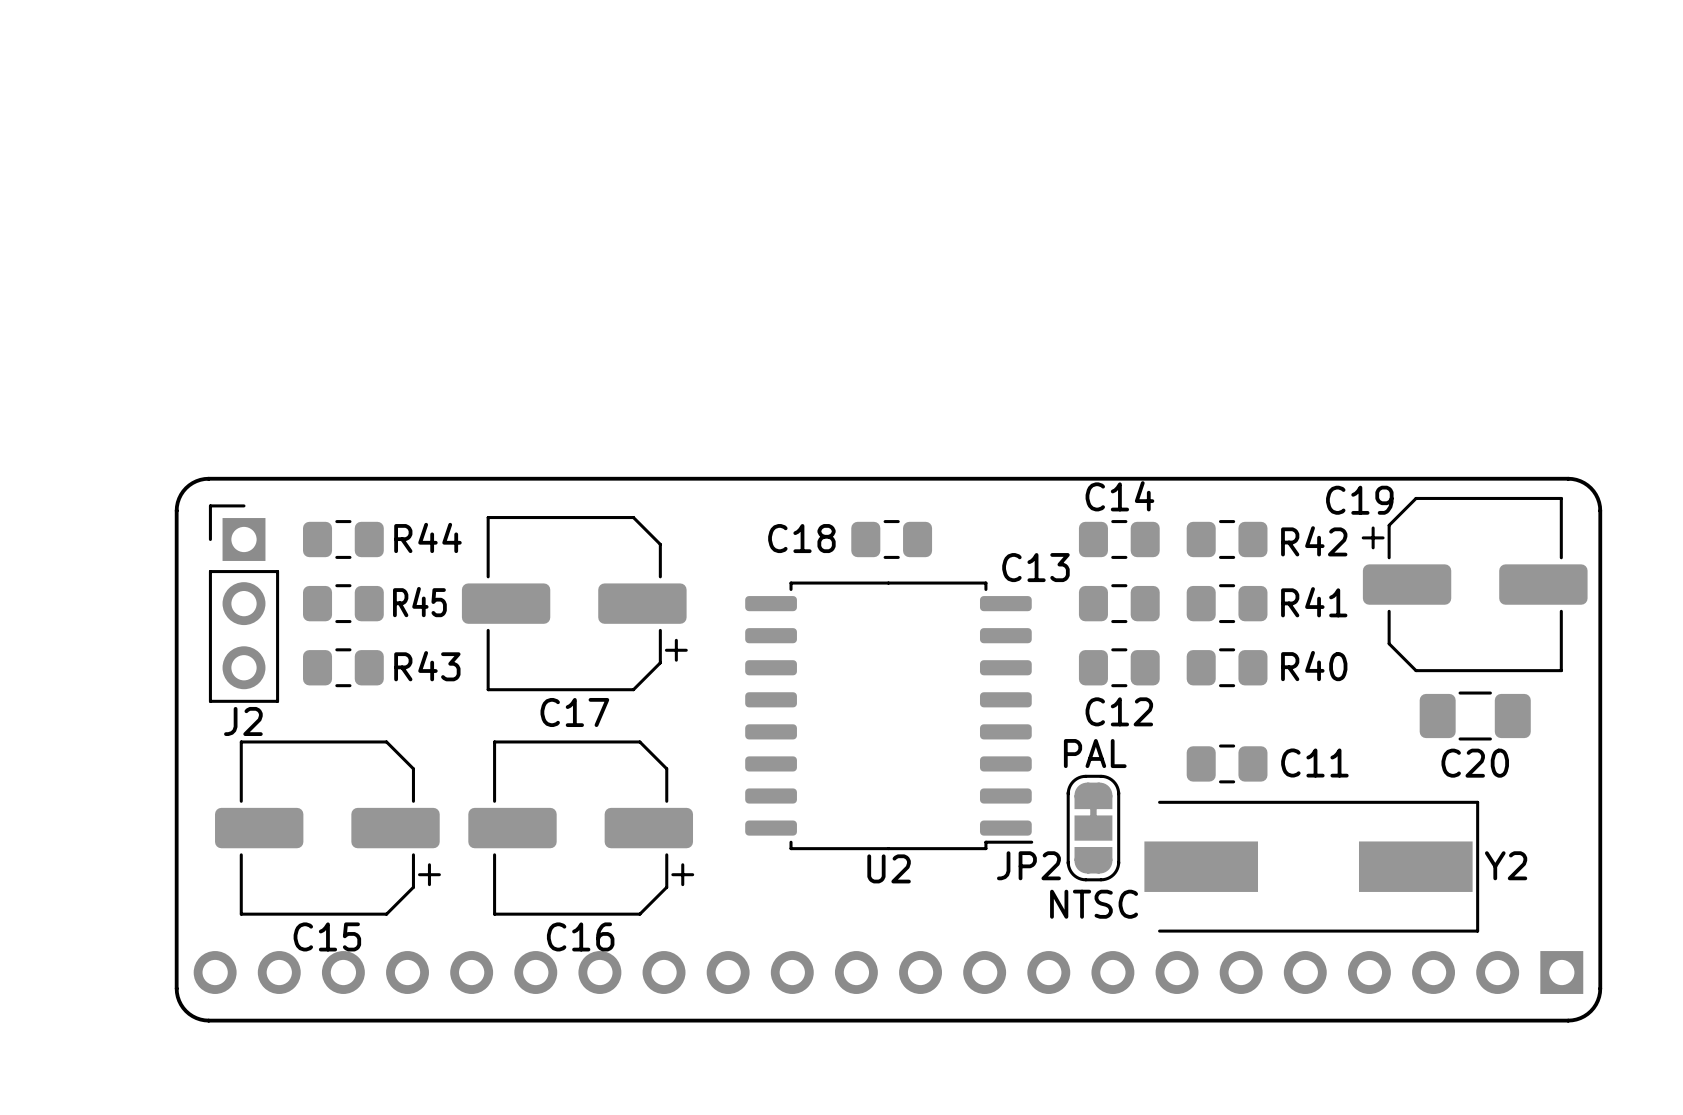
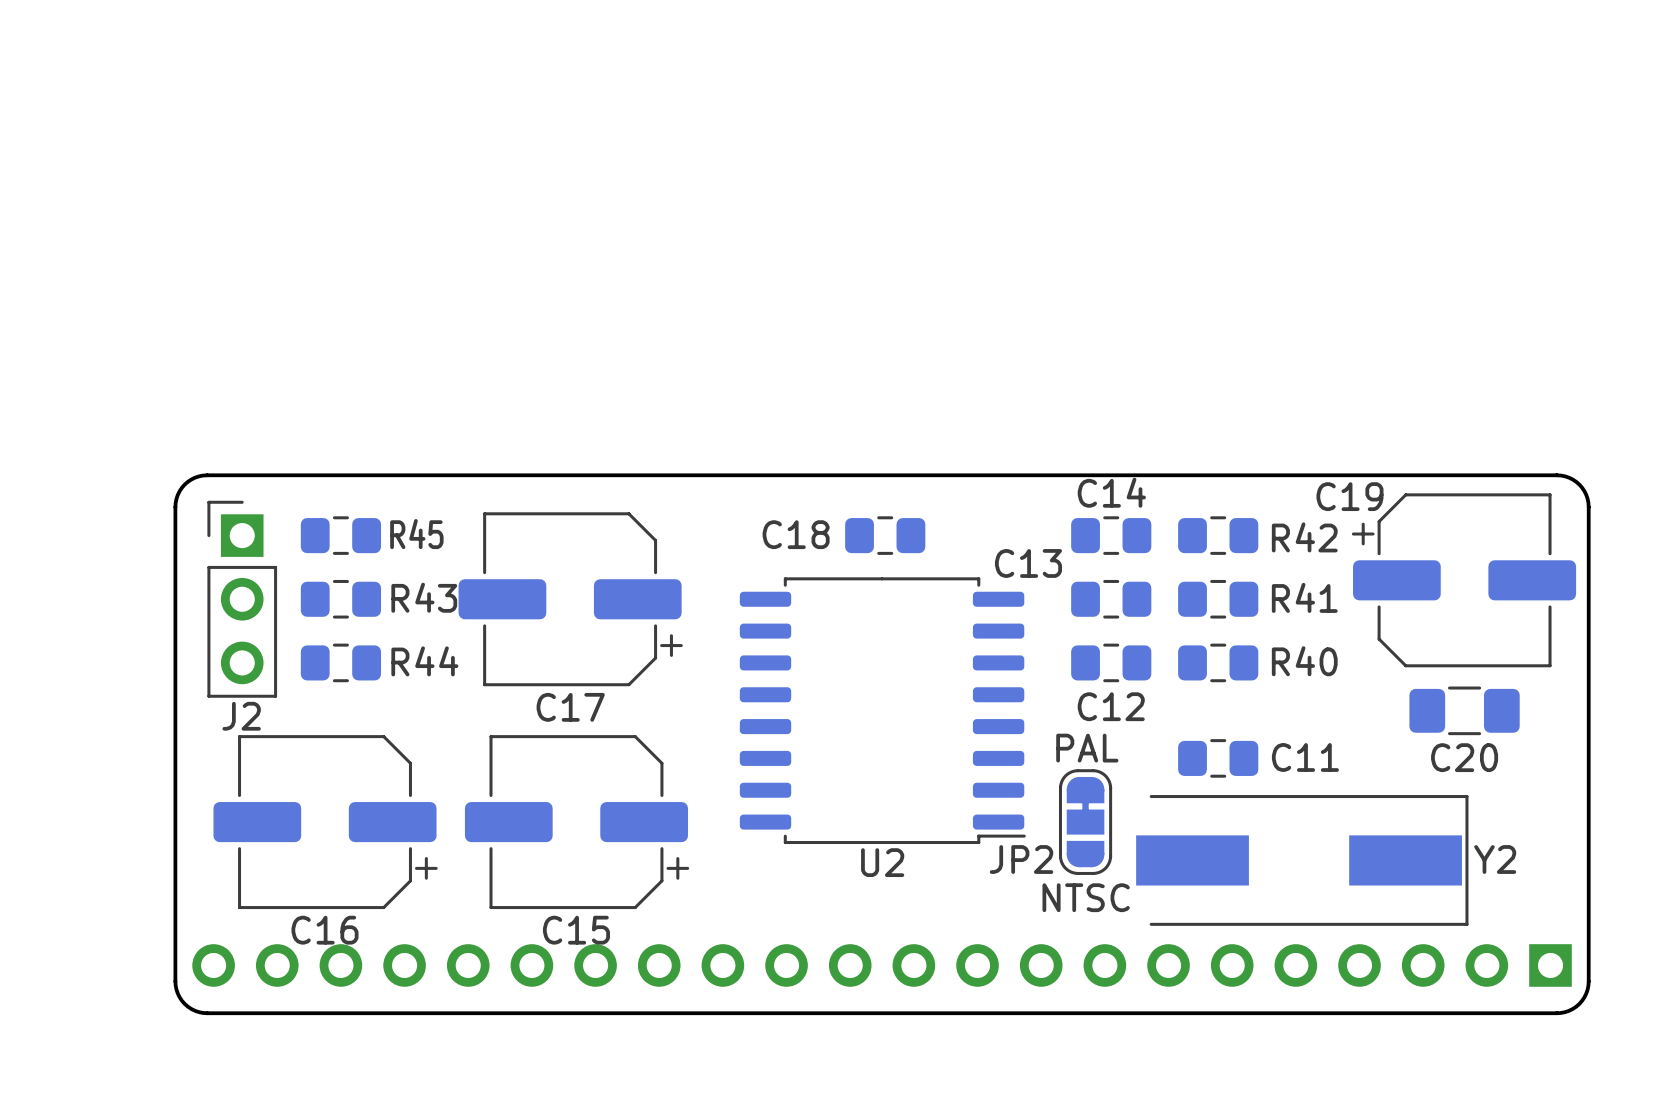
R44 name: R44 (427, 537) -> R45 (416, 534)
R45 name: R45 (419, 602) -> R43 (424, 597)
R43 name: R43 (427, 666) -> R44 (424, 661)
C15 name: C15 (327, 936) -> C16 (325, 930)
C16 name: C16 (580, 936) -> C15 (576, 930)

